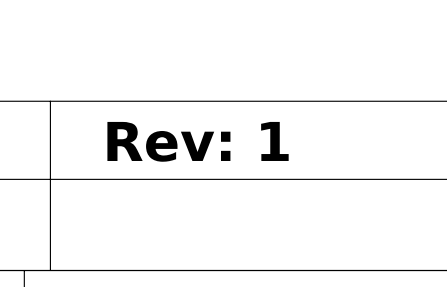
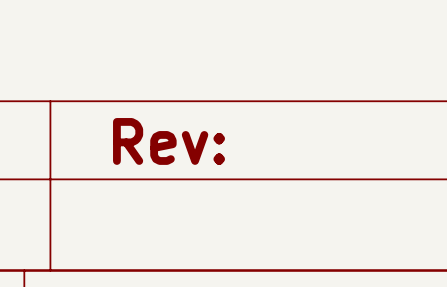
title block: Rev: 1 (198, 141) -> Rev: (169, 141)

